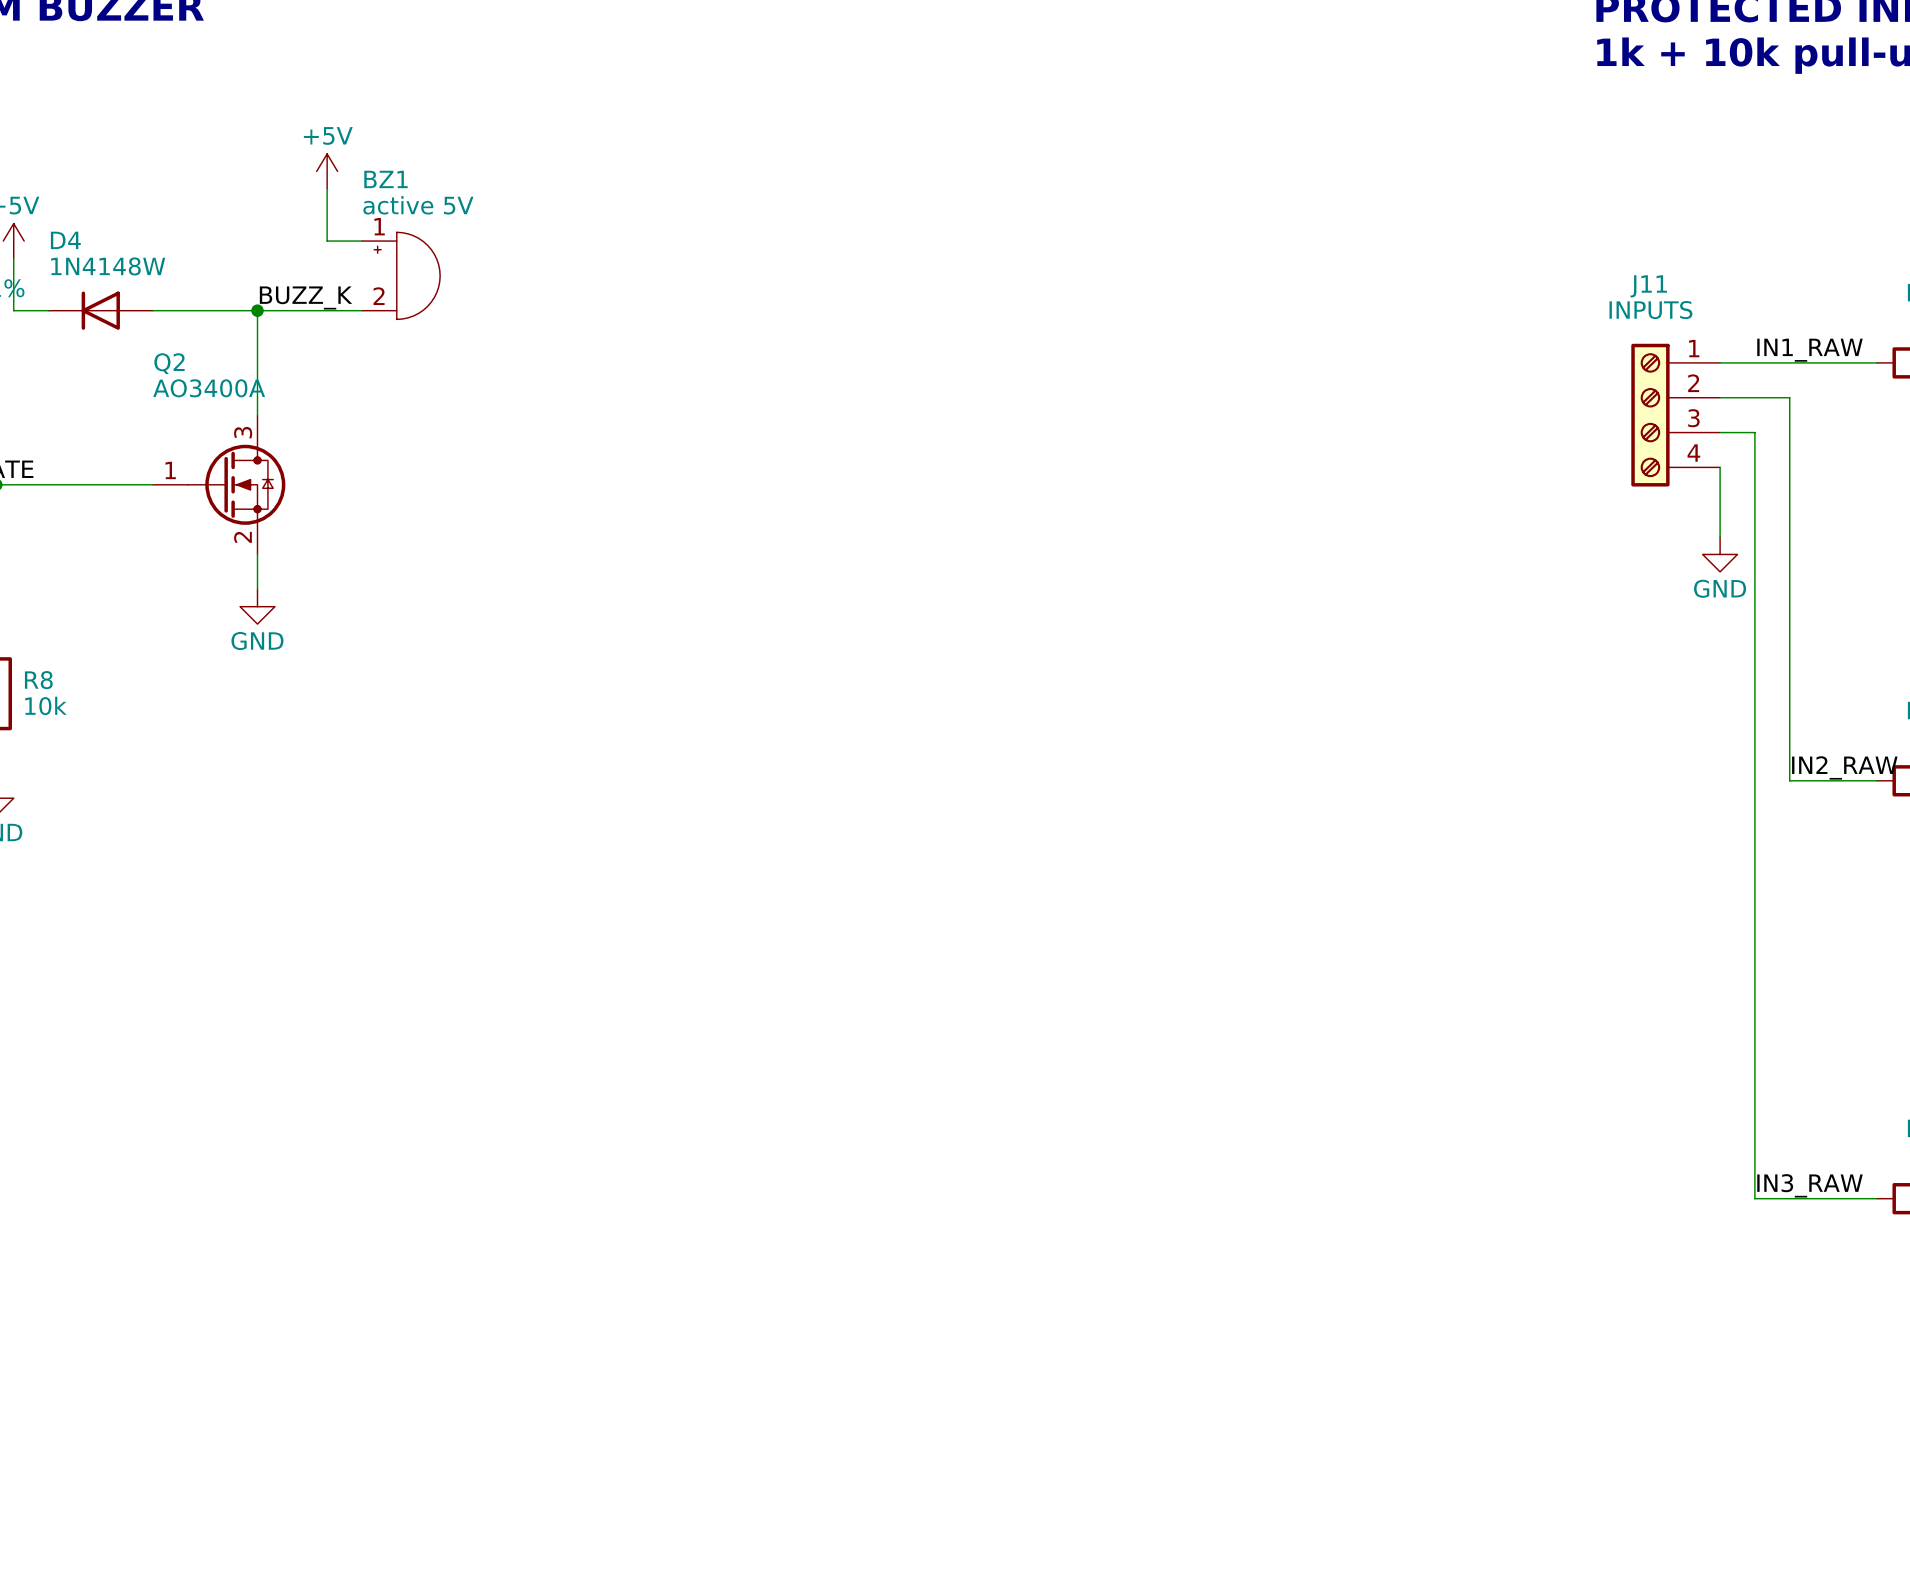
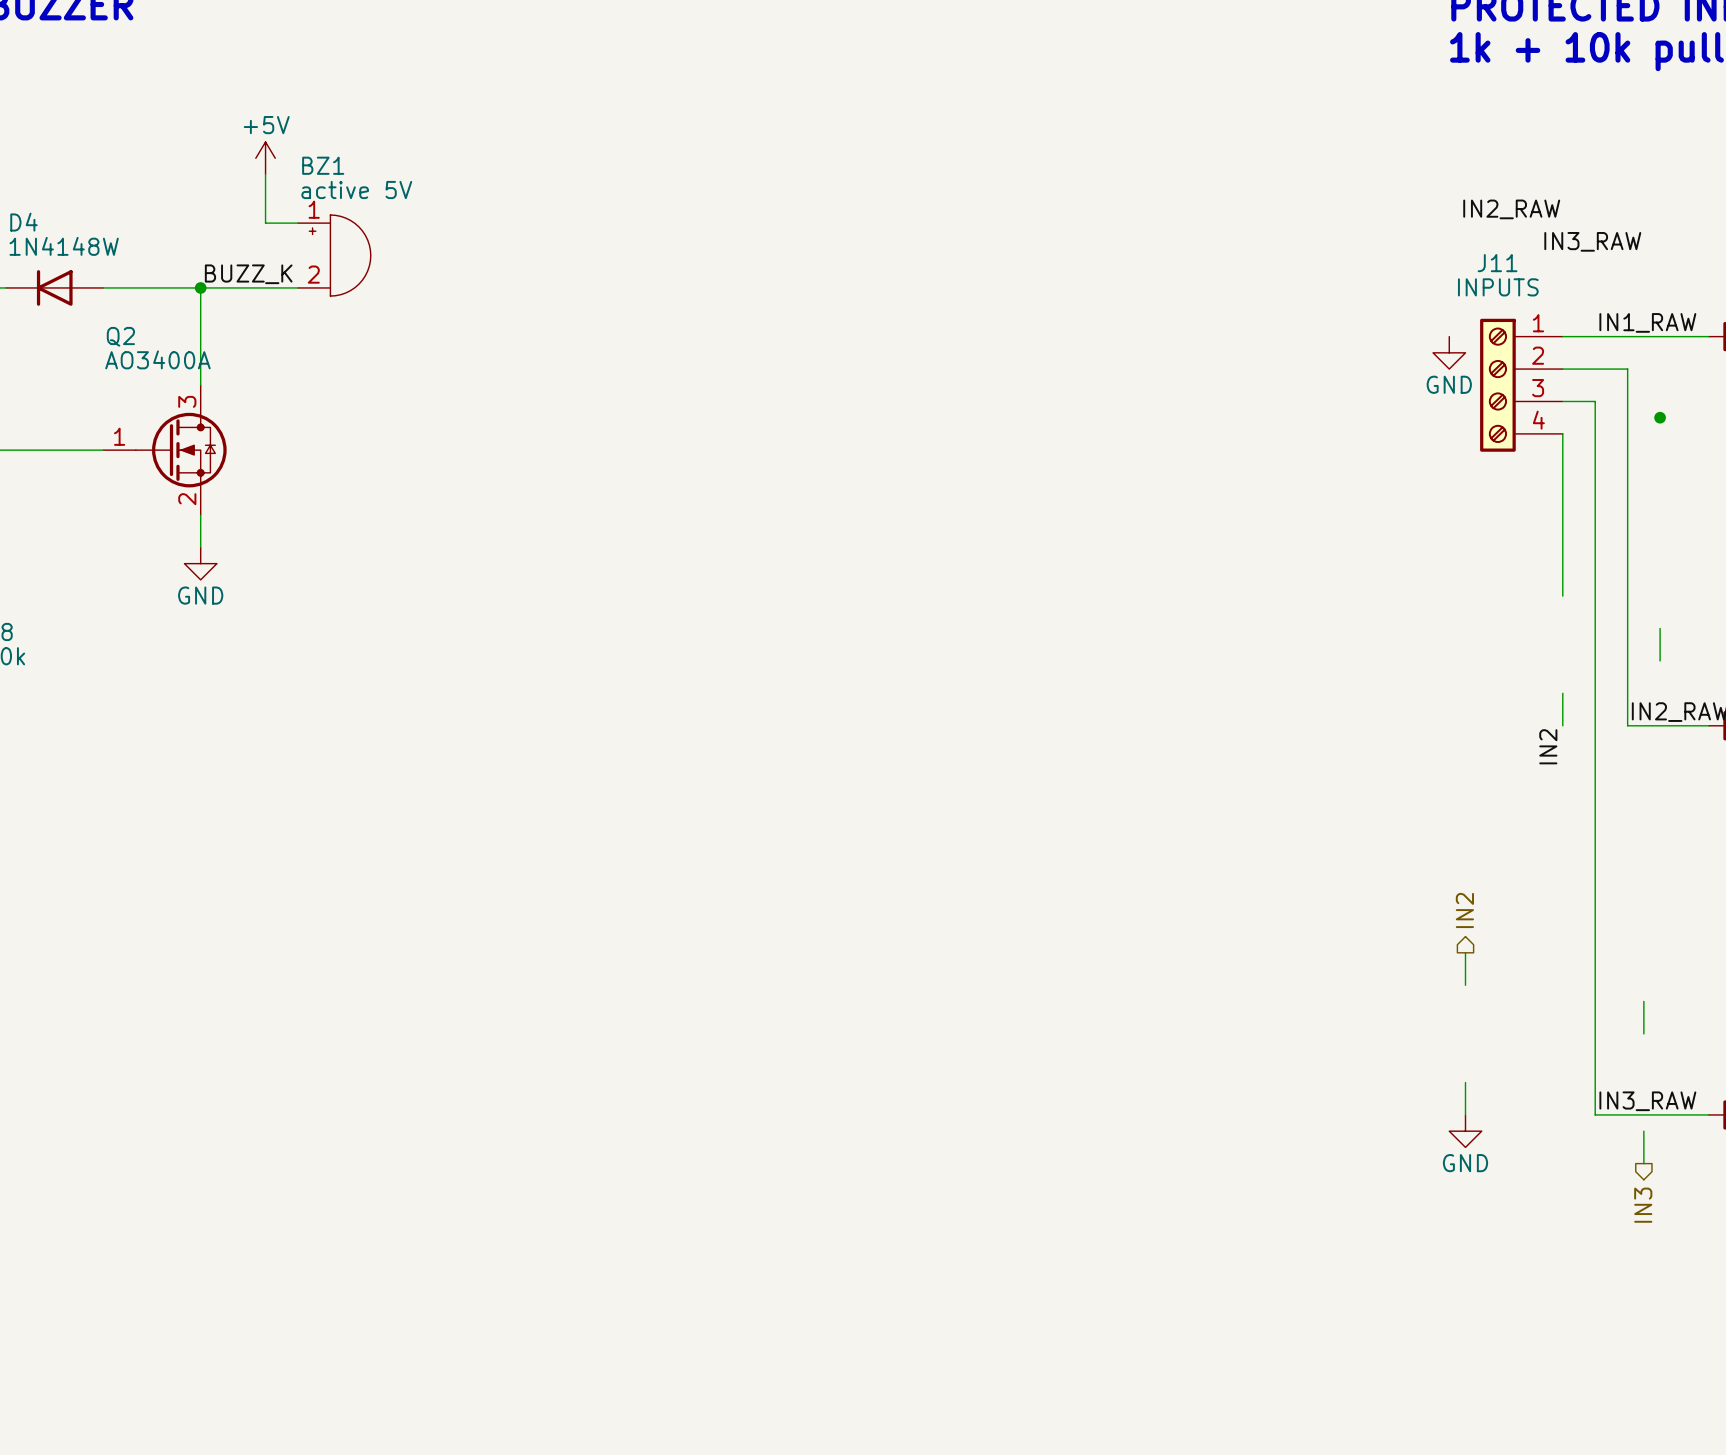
label: none -> IN2_RAW (1511, 209)
label: none -> IN3_RAW (1592, 241)
junction: none -> (1660, 417)
wire: none -> (1562, 498) (1562, 596)
power symbol position: GND (1720, 554) -> GND (1449, 352)
wire: none -> (1660, 628) (1660, 660)
wire: none -> (1562, 693) (1562, 725)
label: none -> IN2 (1548, 746)
hierarchical label: none -> IN2 (1464, 910)
wire: none -> (1465, 952) (1465, 985)
wire: none -> (1643, 1001) (1643, 1033)
wire: none -> (1465, 1082) (1465, 1114)
power symbol: none -> GND (1465, 1131)
wire: none -> (1643, 1131) (1643, 1163)
hierarchical label: none -> IN3 (1643, 1205)

